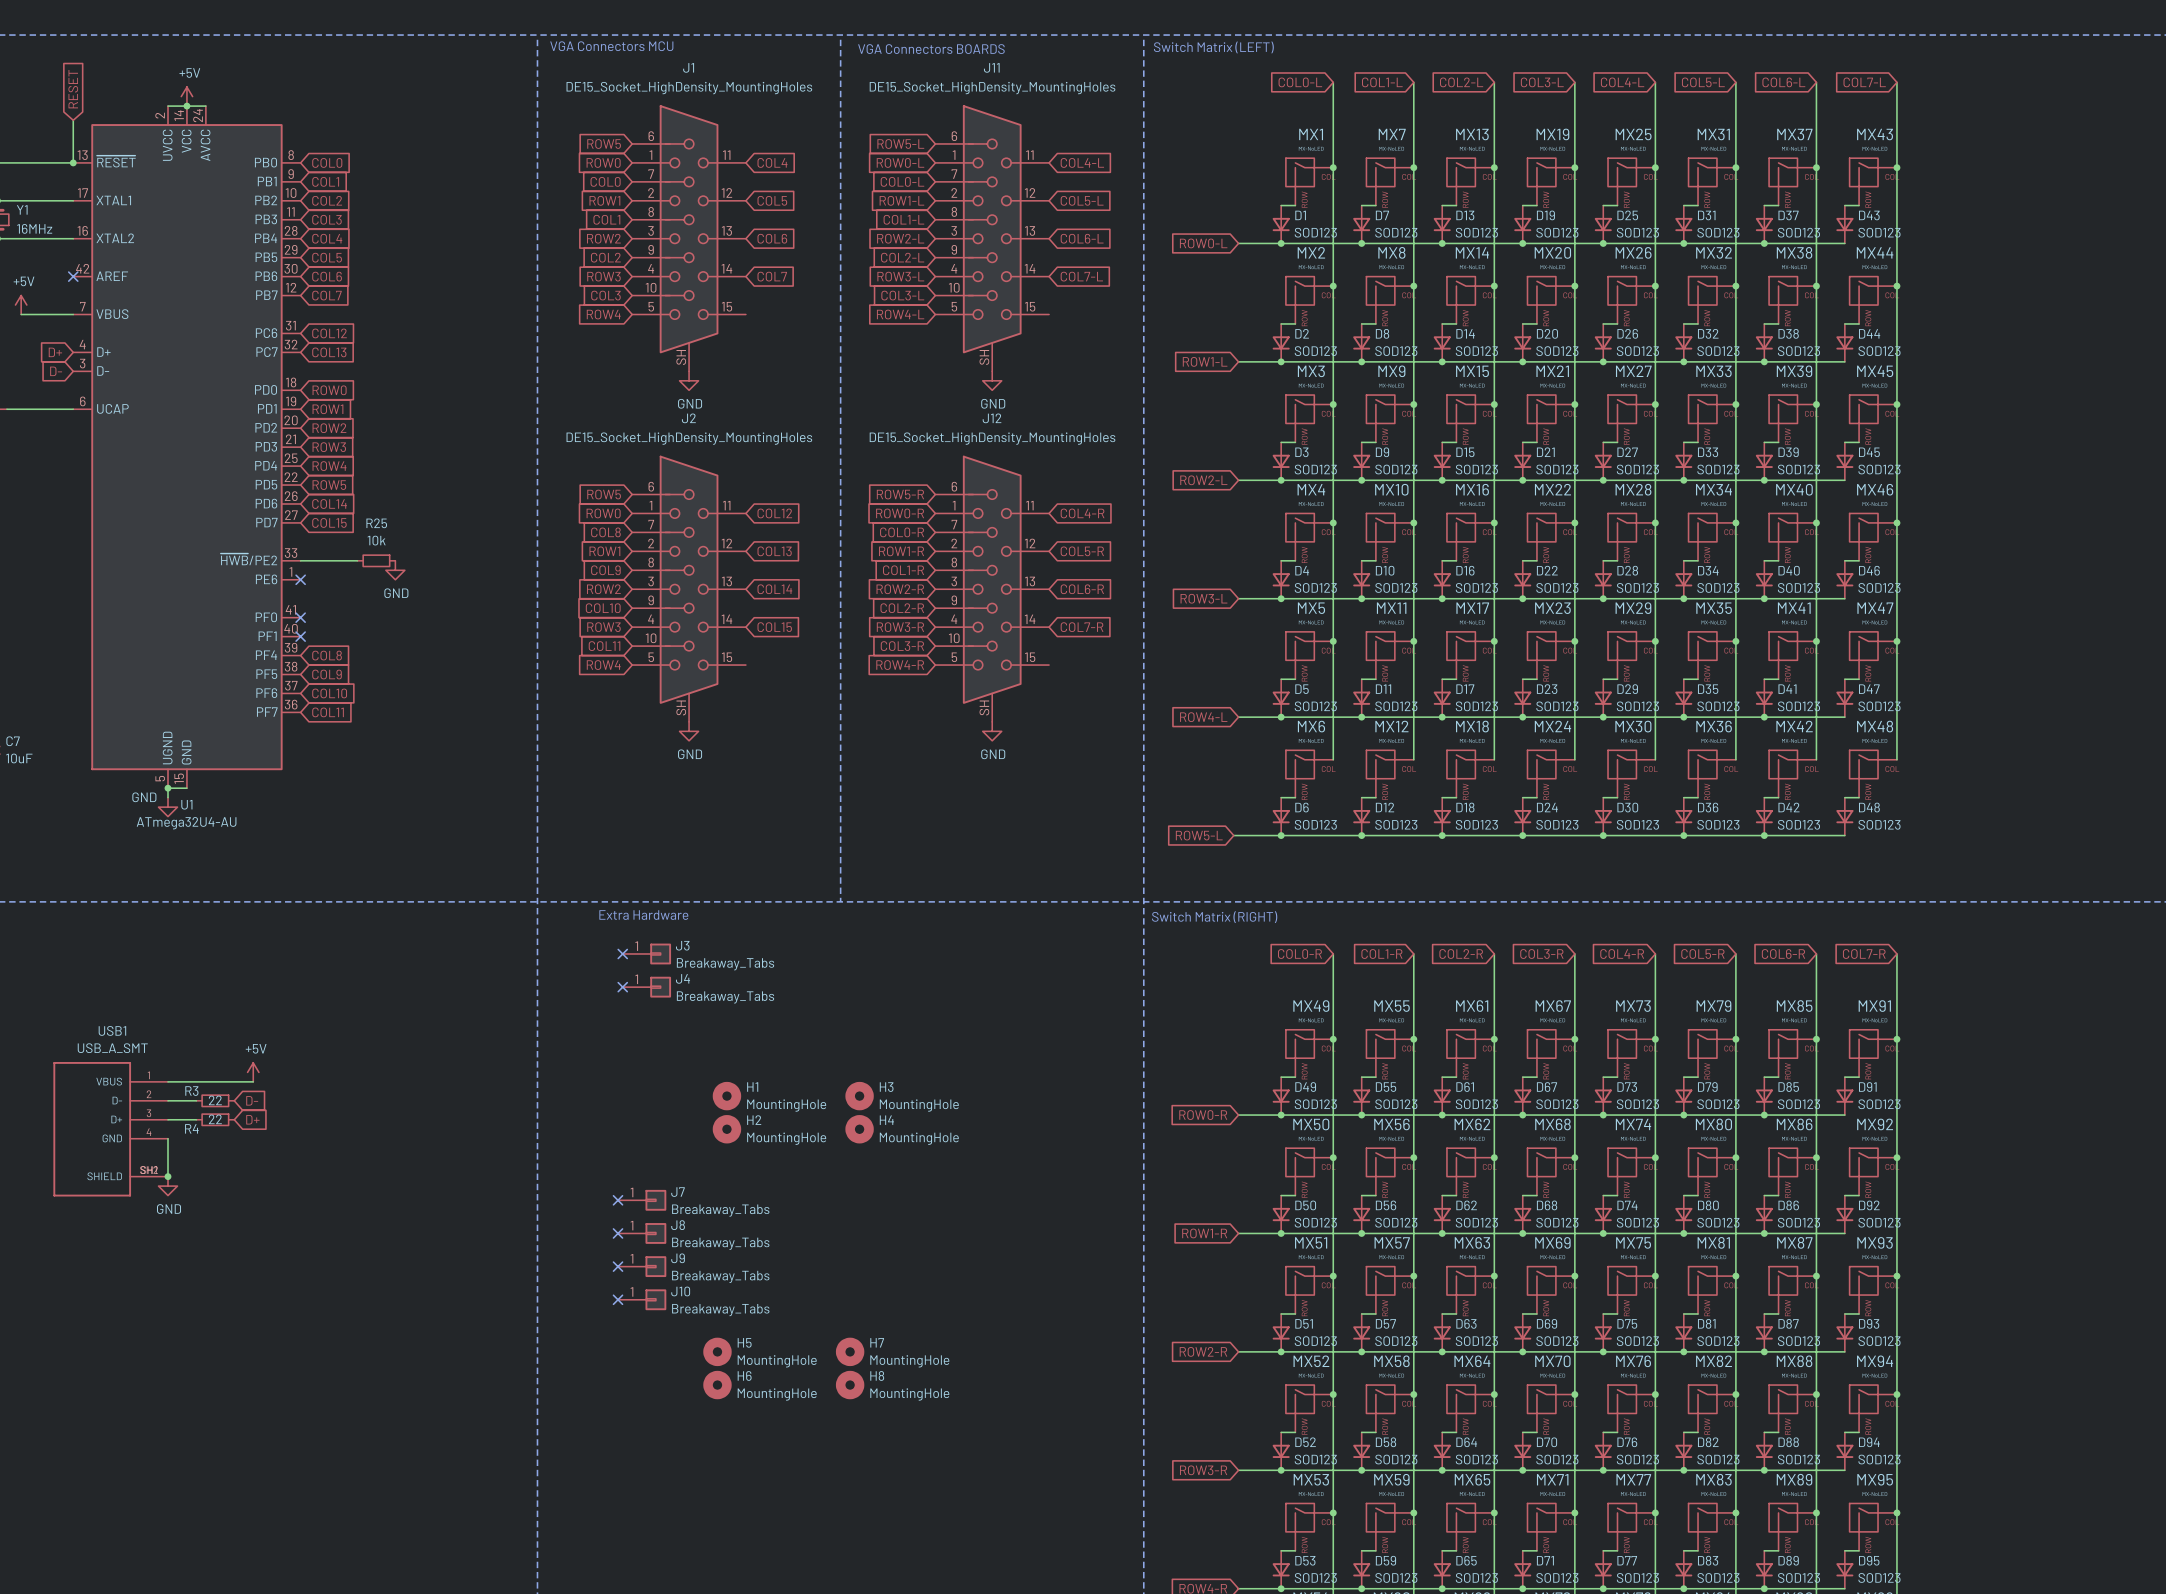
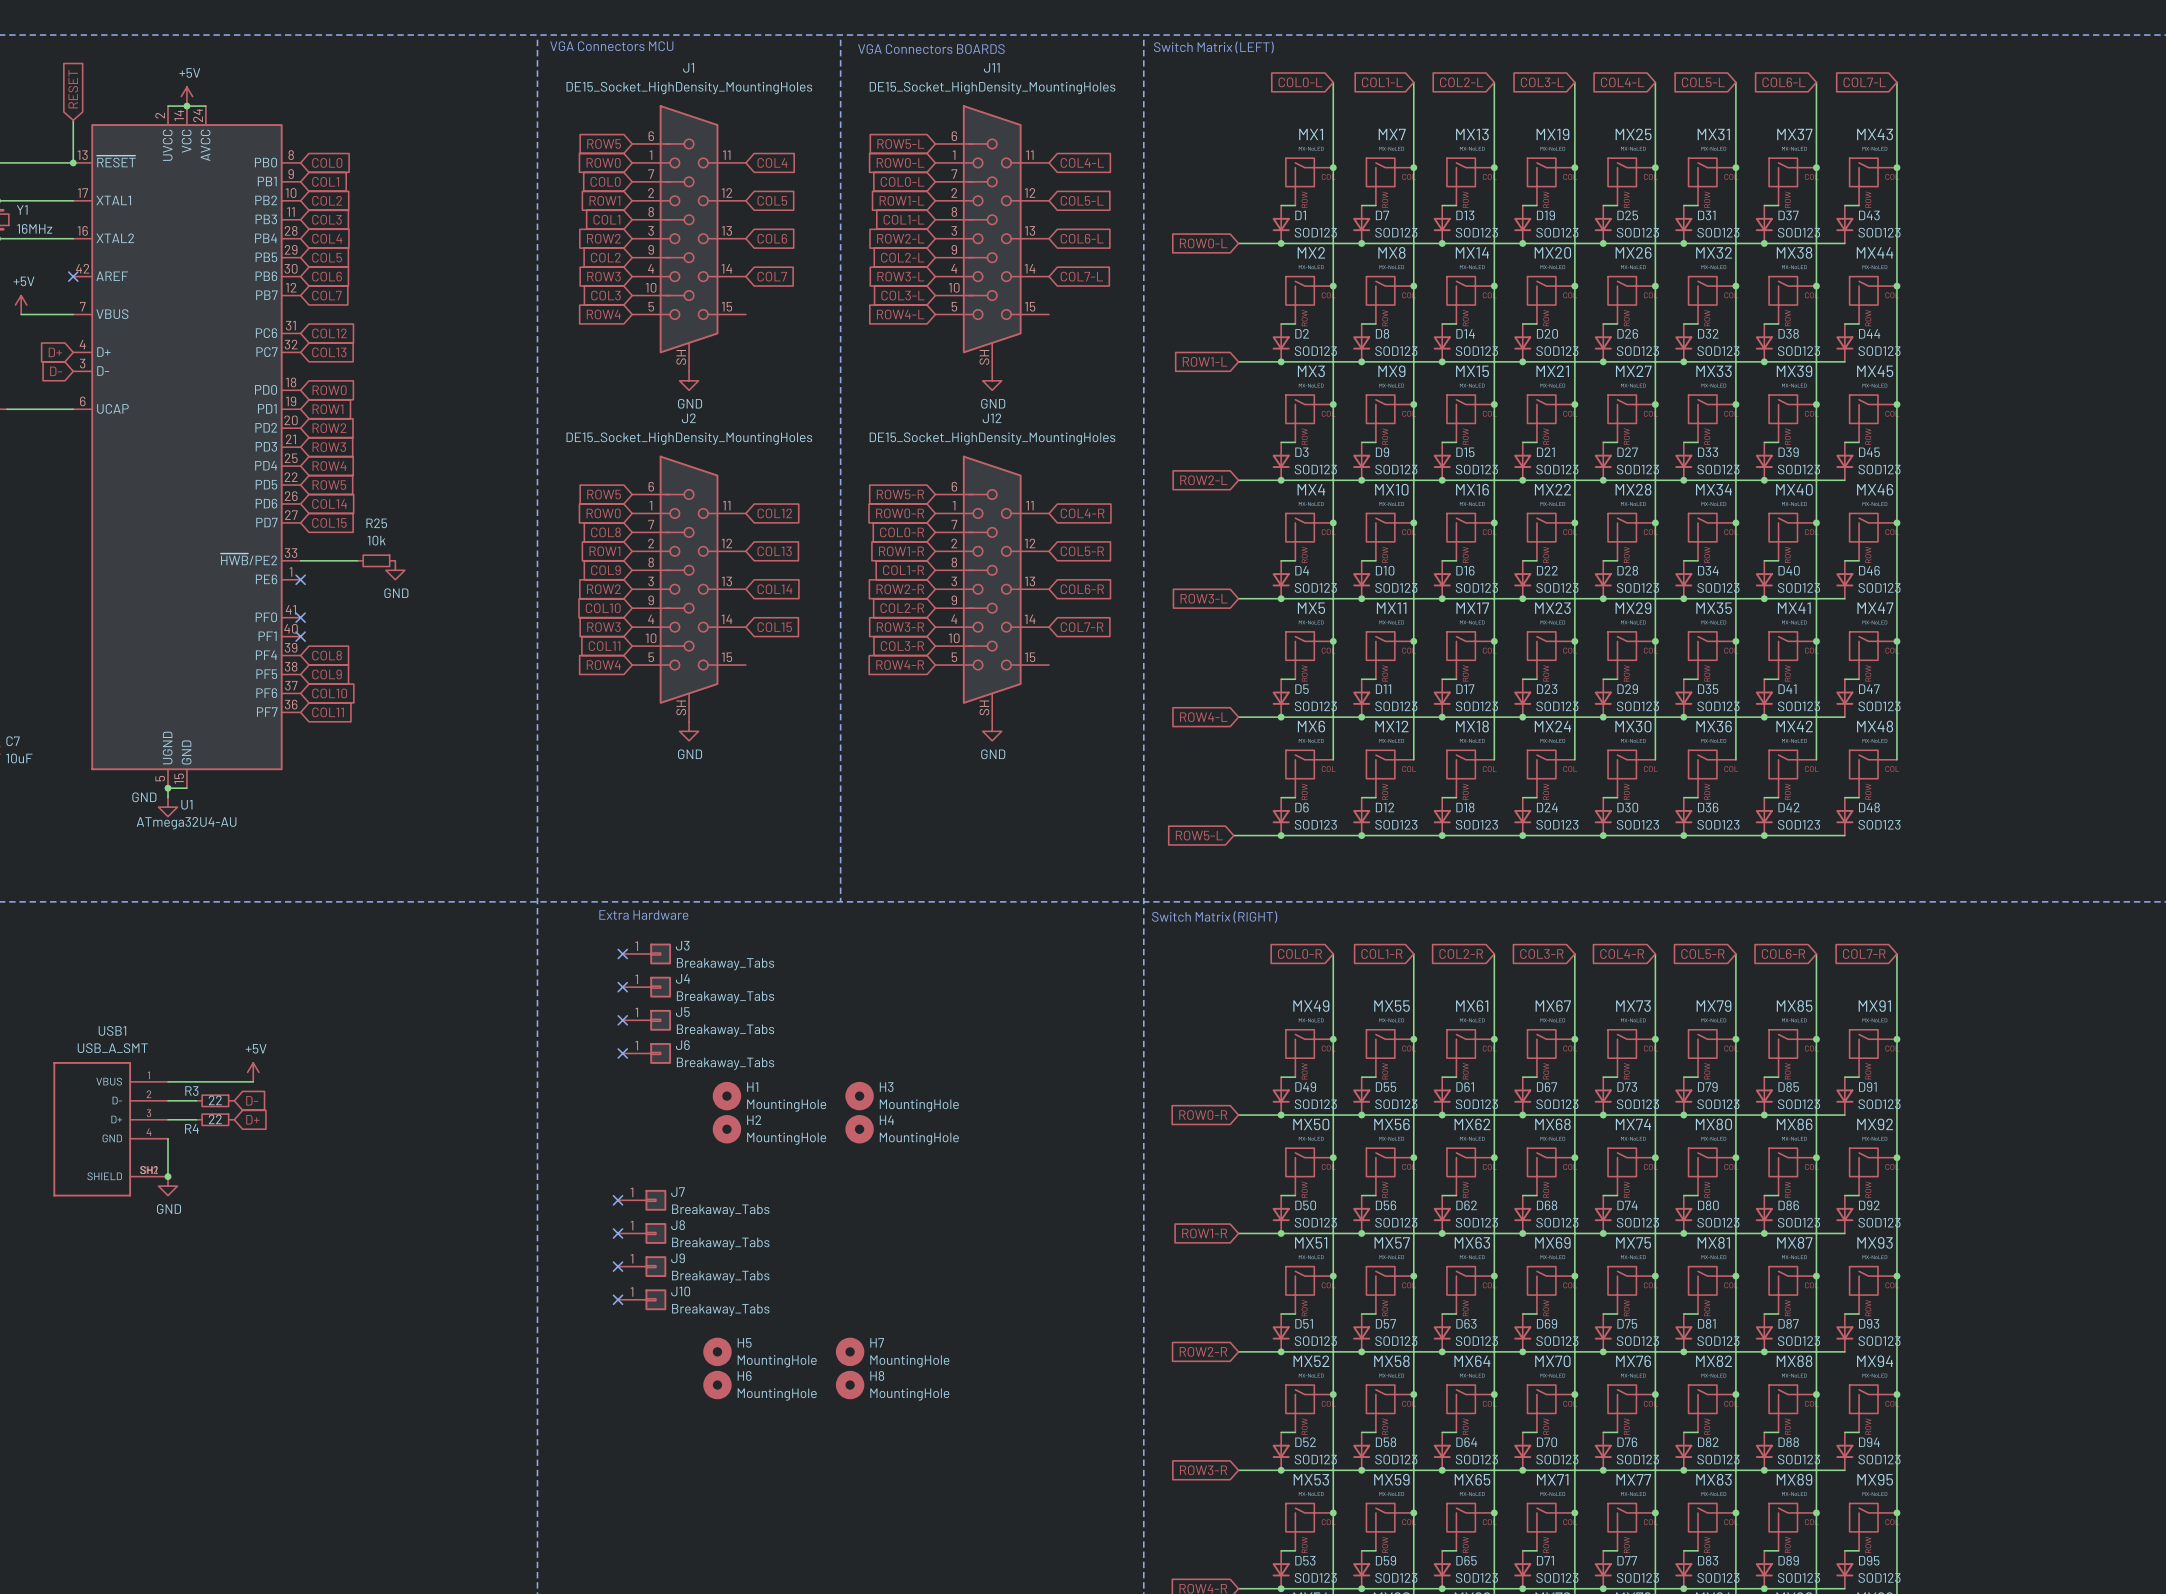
no-connect mark: none -> (622, 1020)
J5: none -> Breakaway_Tabs (646, 1020)
no-connect mark: none -> (622, 1053)
J6: none -> Breakaway_Tabs (646, 1053)

